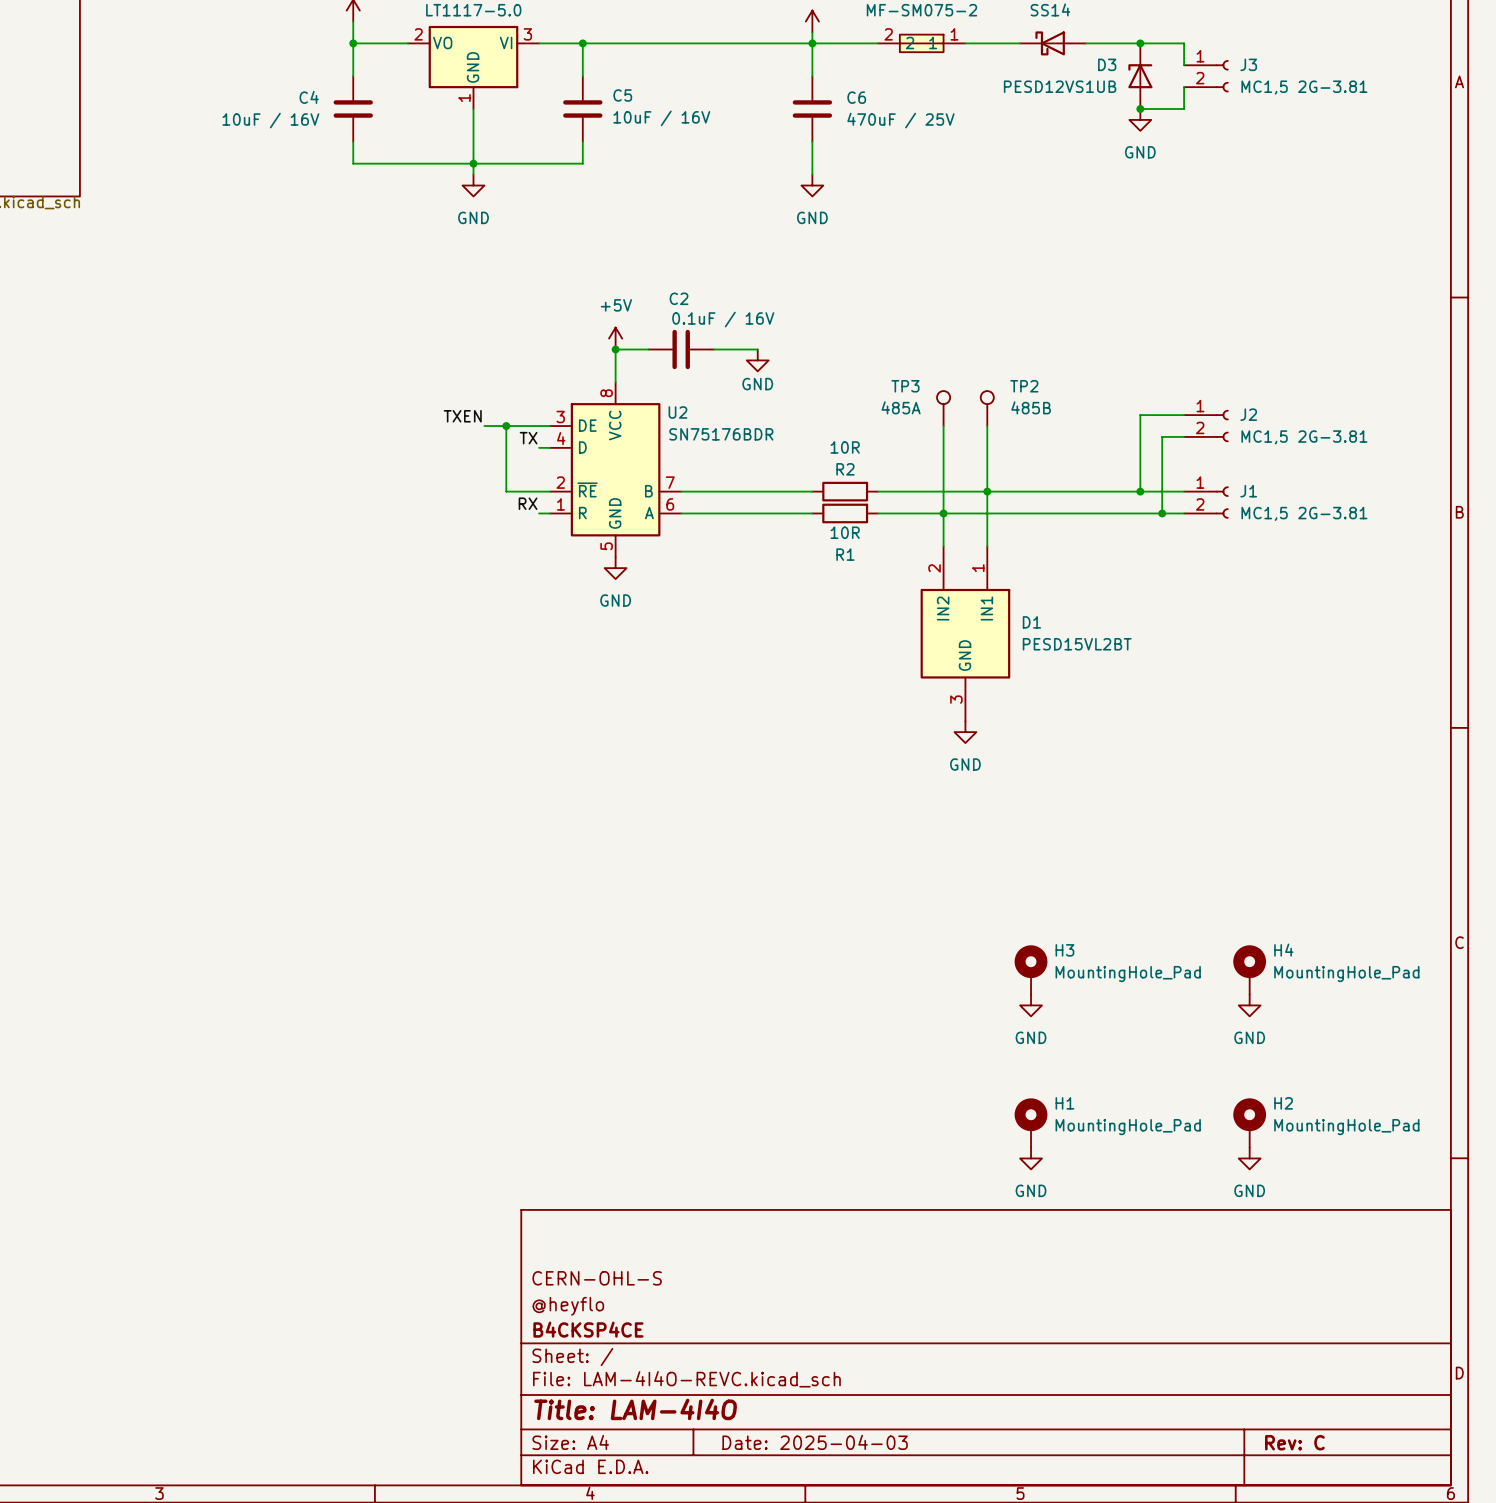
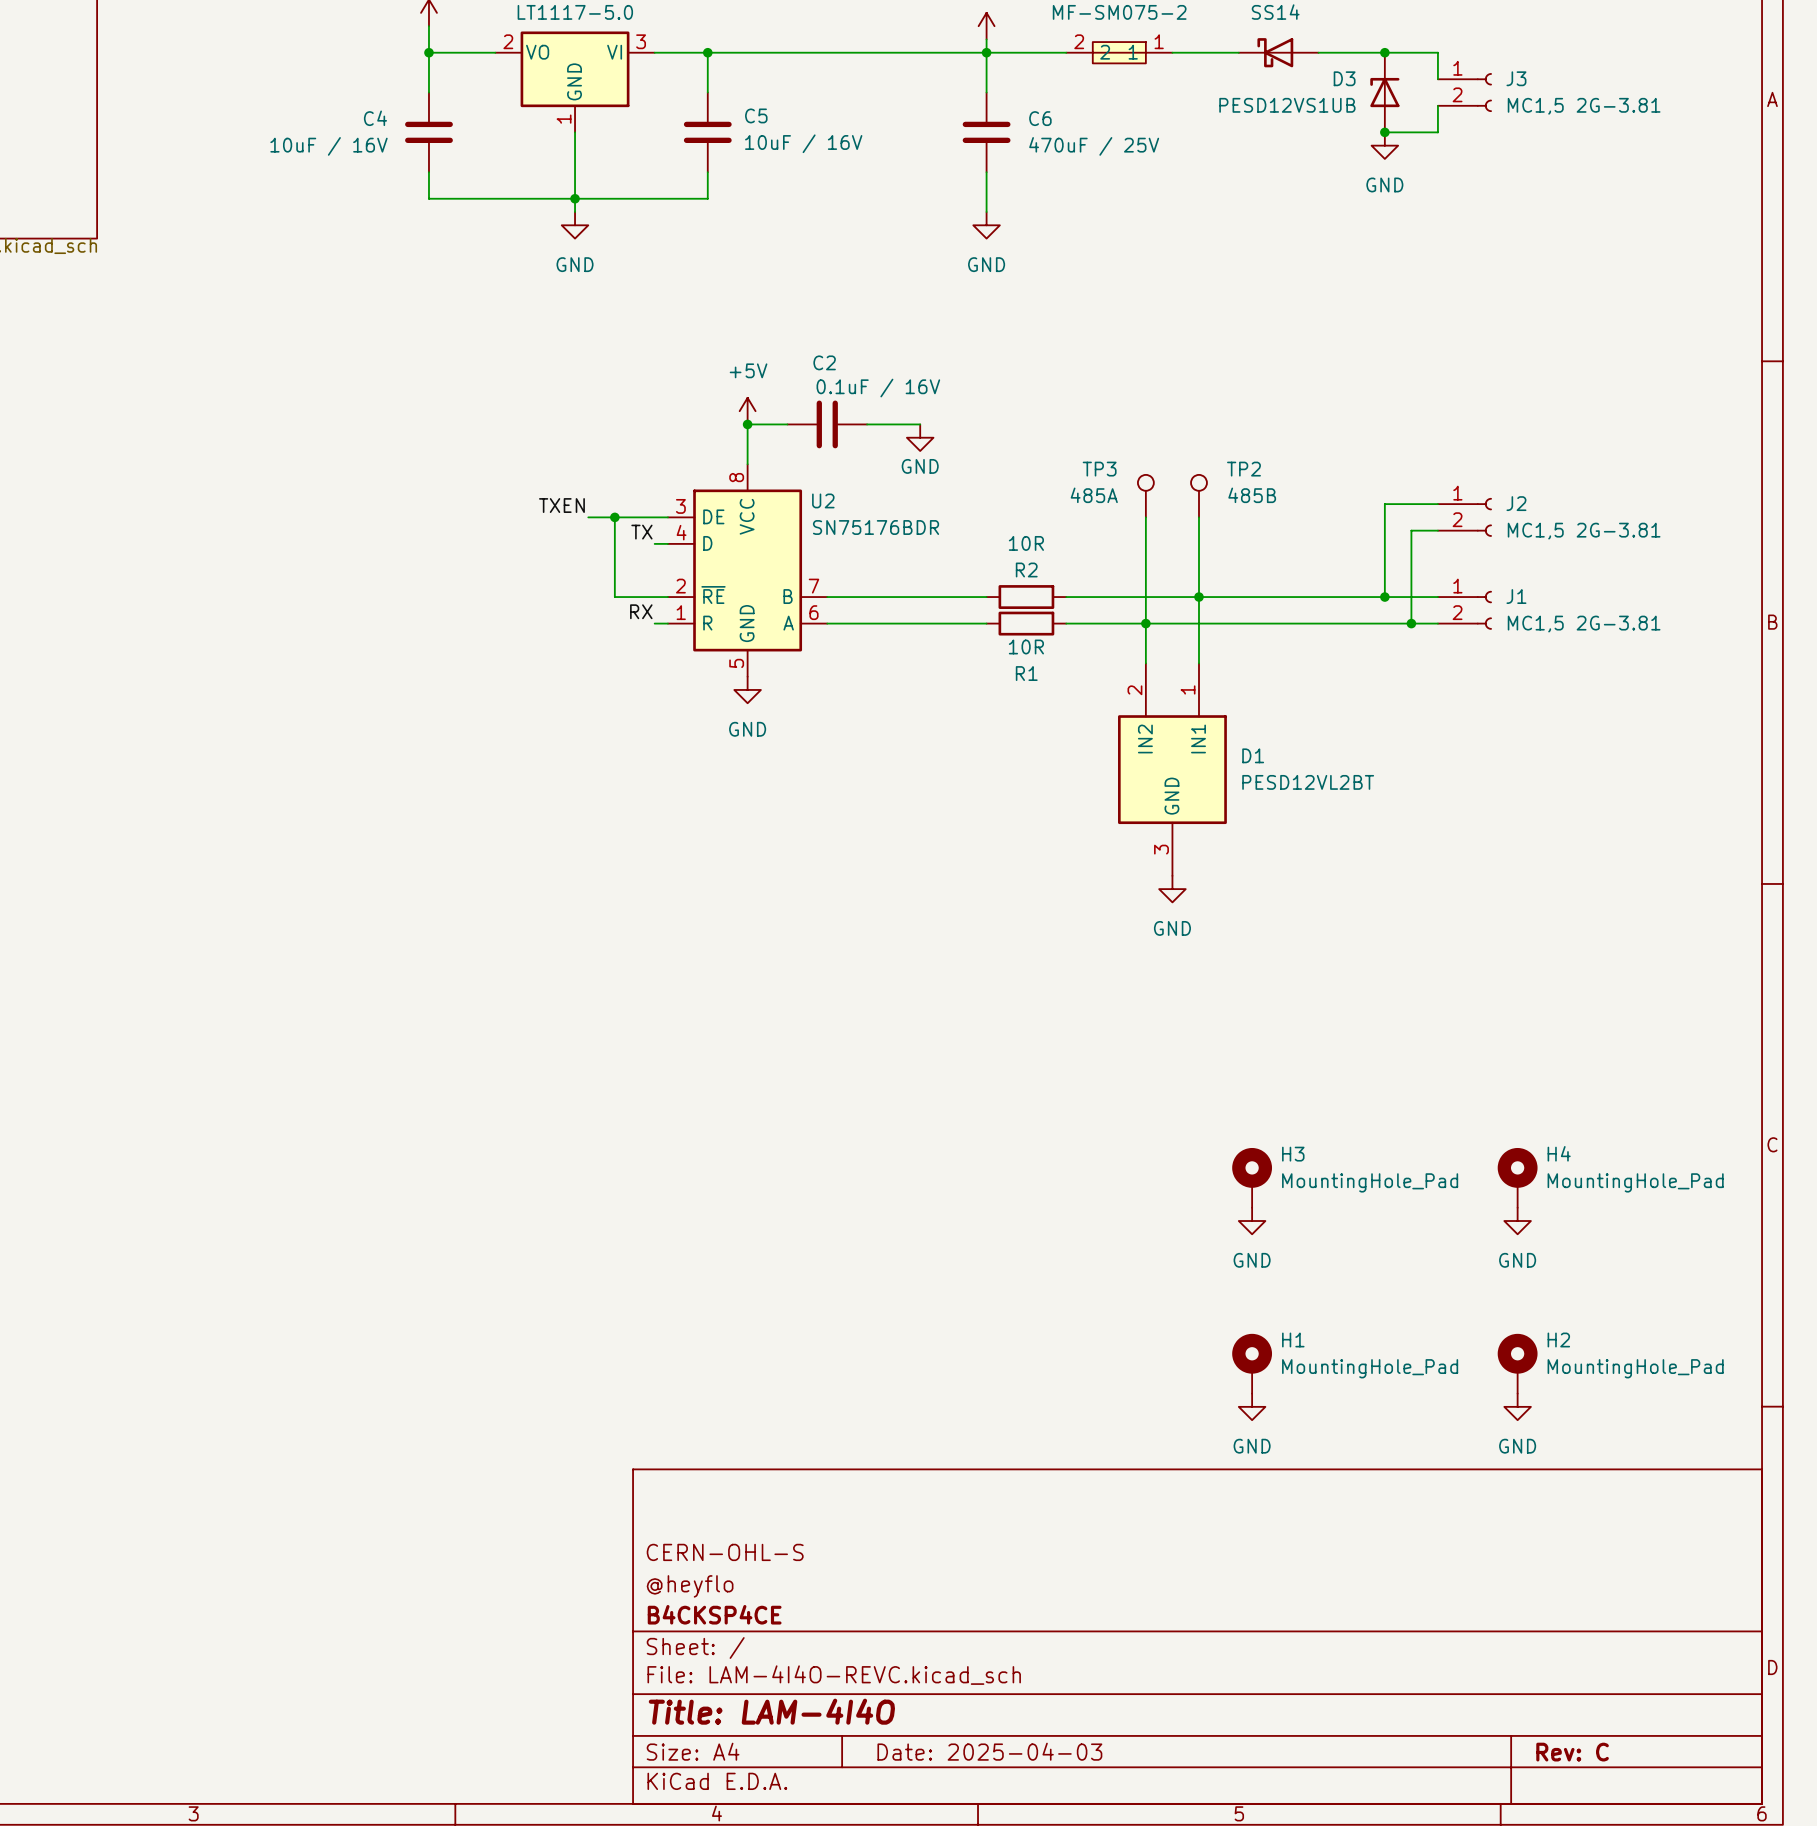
D1 value: PESD15VL2BT (1077, 644) -> PESD12VL2BT (1308, 782)

